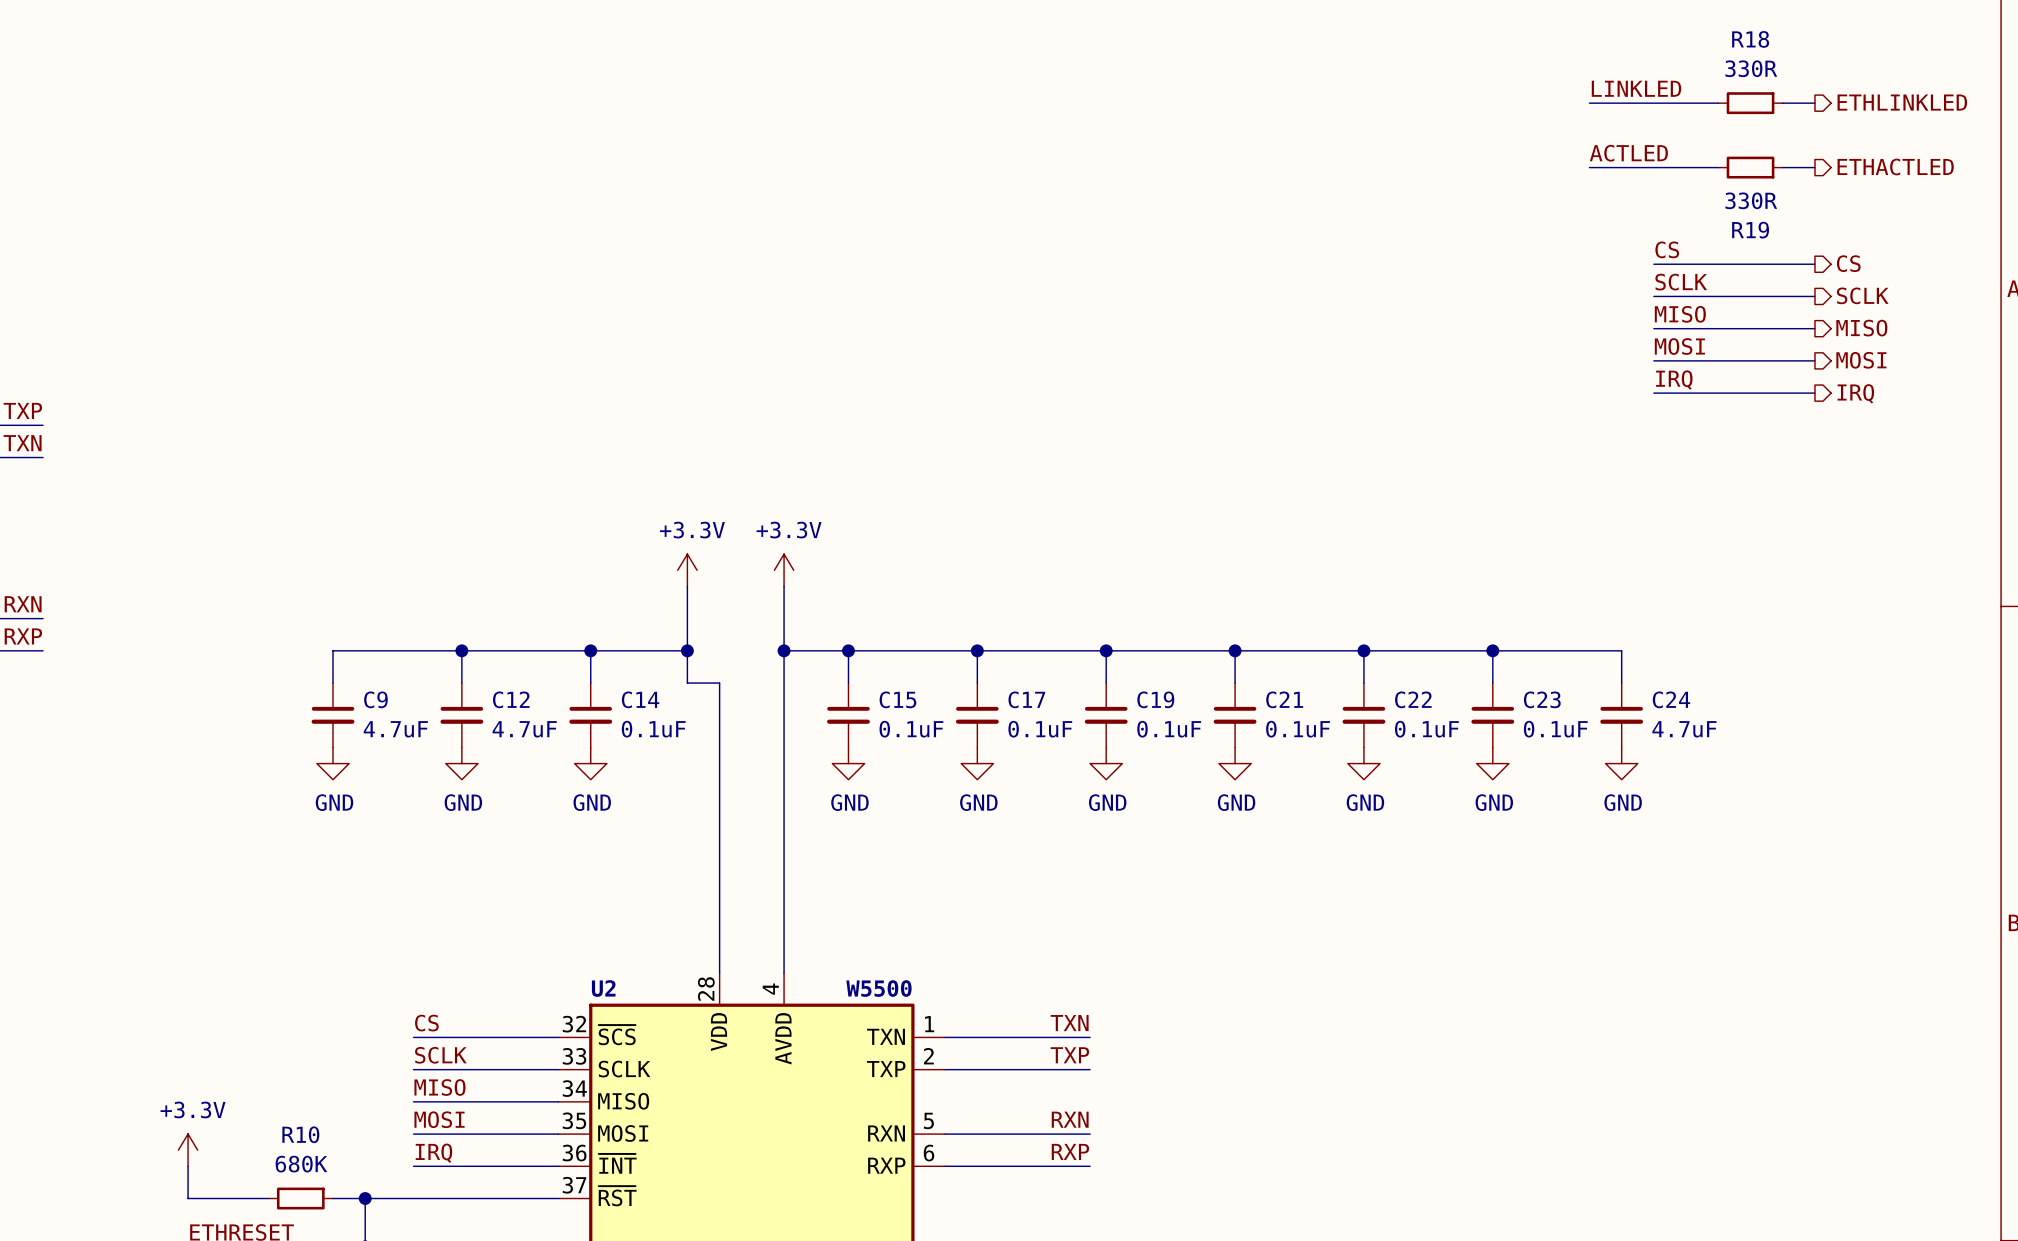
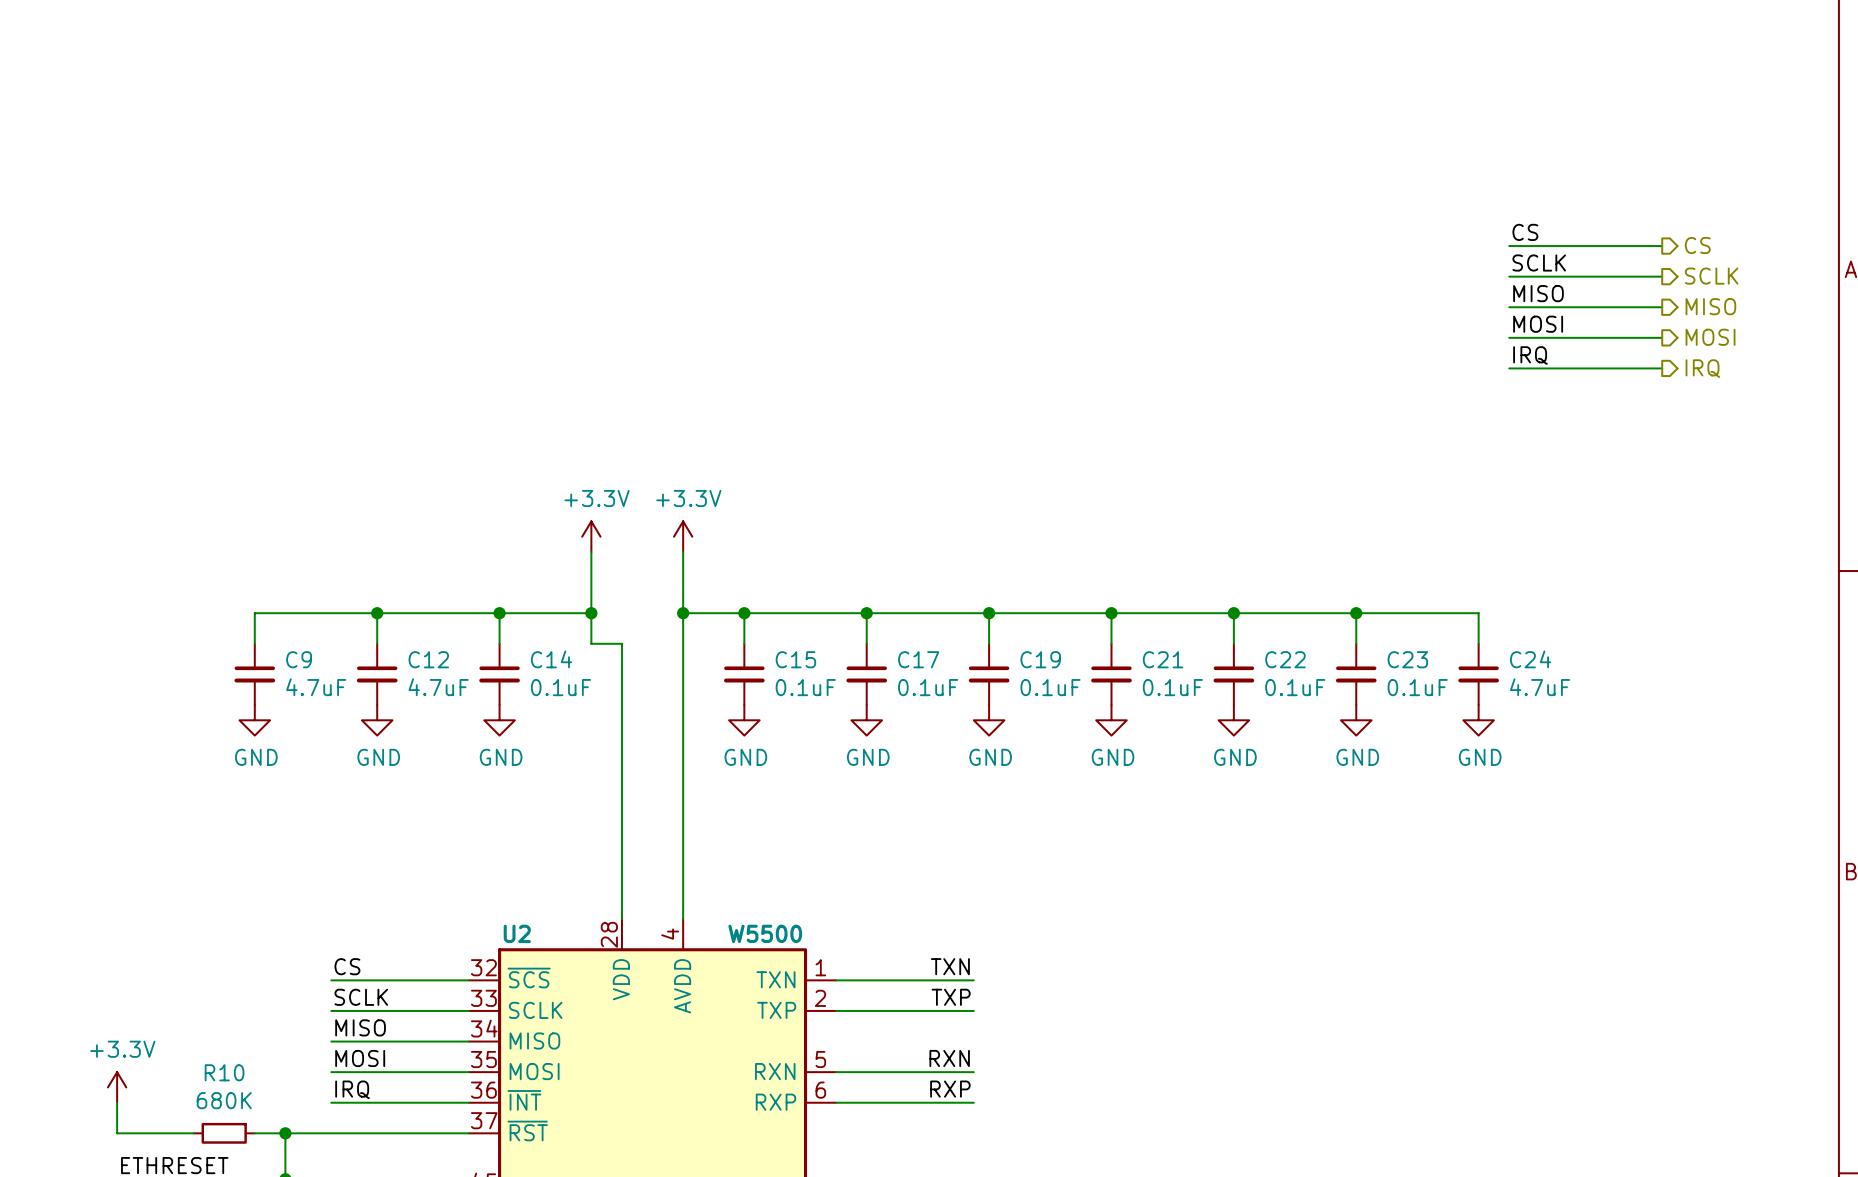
label: LINKLED (1636, 88) -> none
hierarchical label: ETHLINKLED (1902, 102) -> none
wire: (1589, 103) (1718, 103) -> none
R18: 330R (1750, 103) -> none
wire: (1782, 103) (1814, 103) -> none
label: ACTLED (1628, 153) -> none
hierarchical label: ETHACTLED (1895, 166) -> none
wire: (1589, 167) (1718, 167) -> none
R19: 330R (1750, 167) -> none
wire: (1782, 167) (1814, 167) -> none

